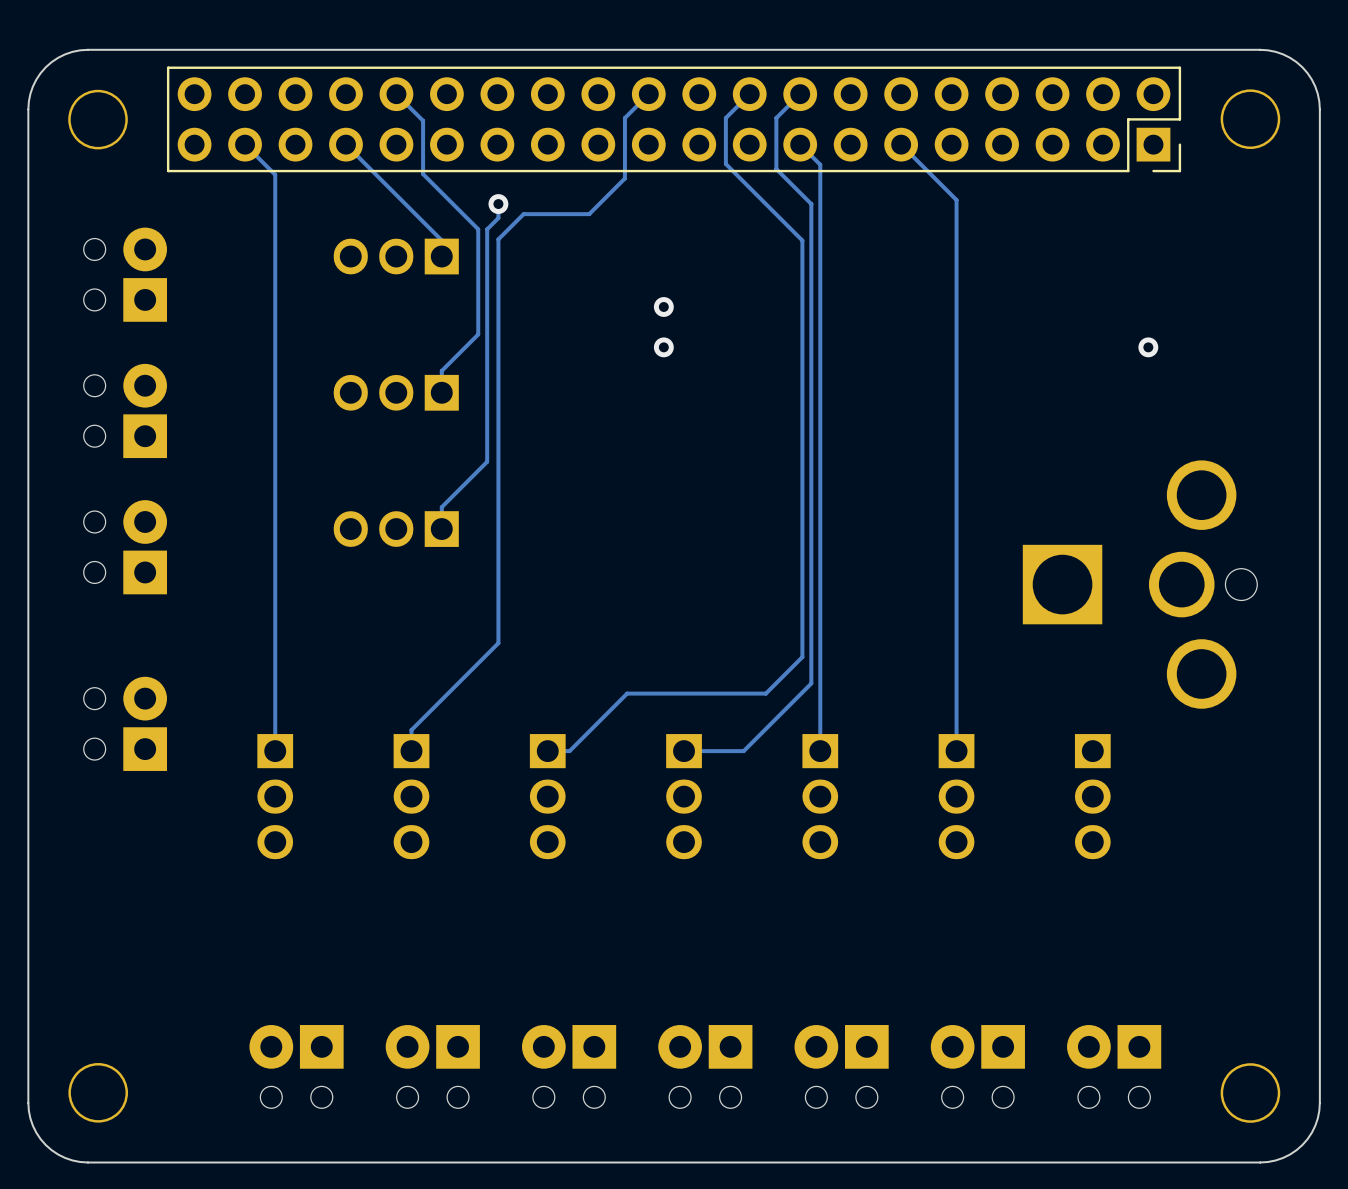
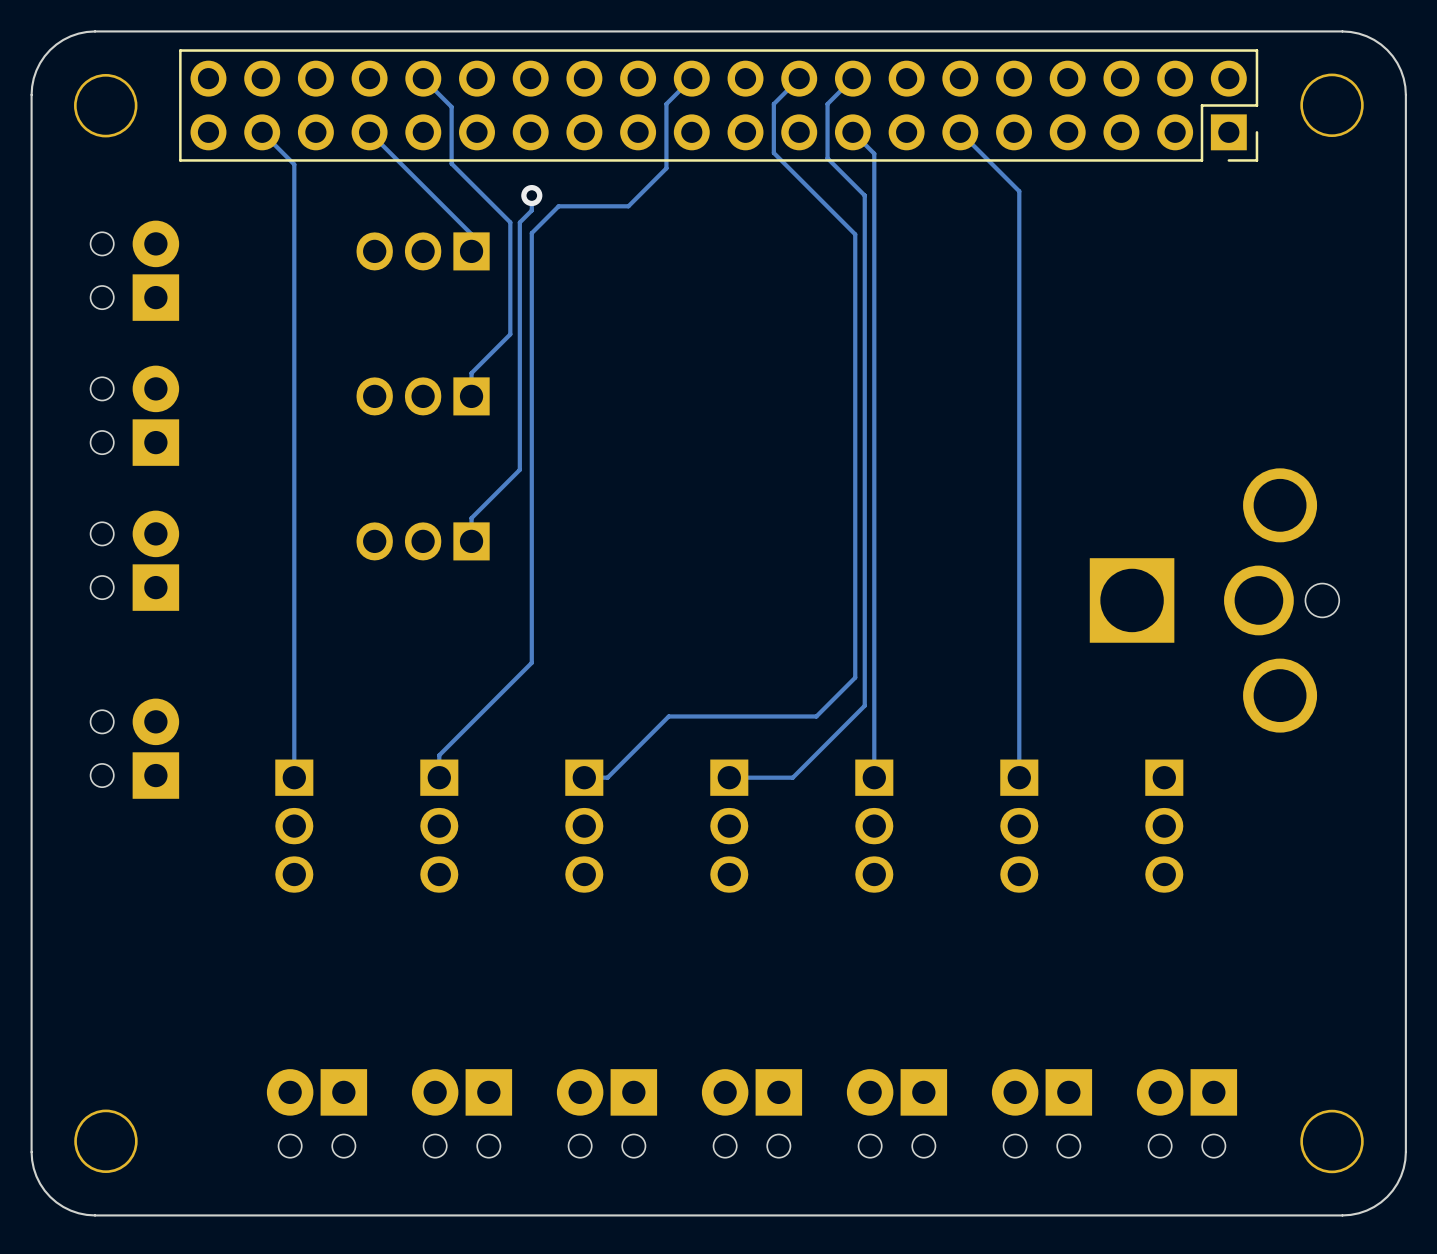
via: (663, 306) -> none
via: (663, 347) -> none
via: (1148, 347) -> none

